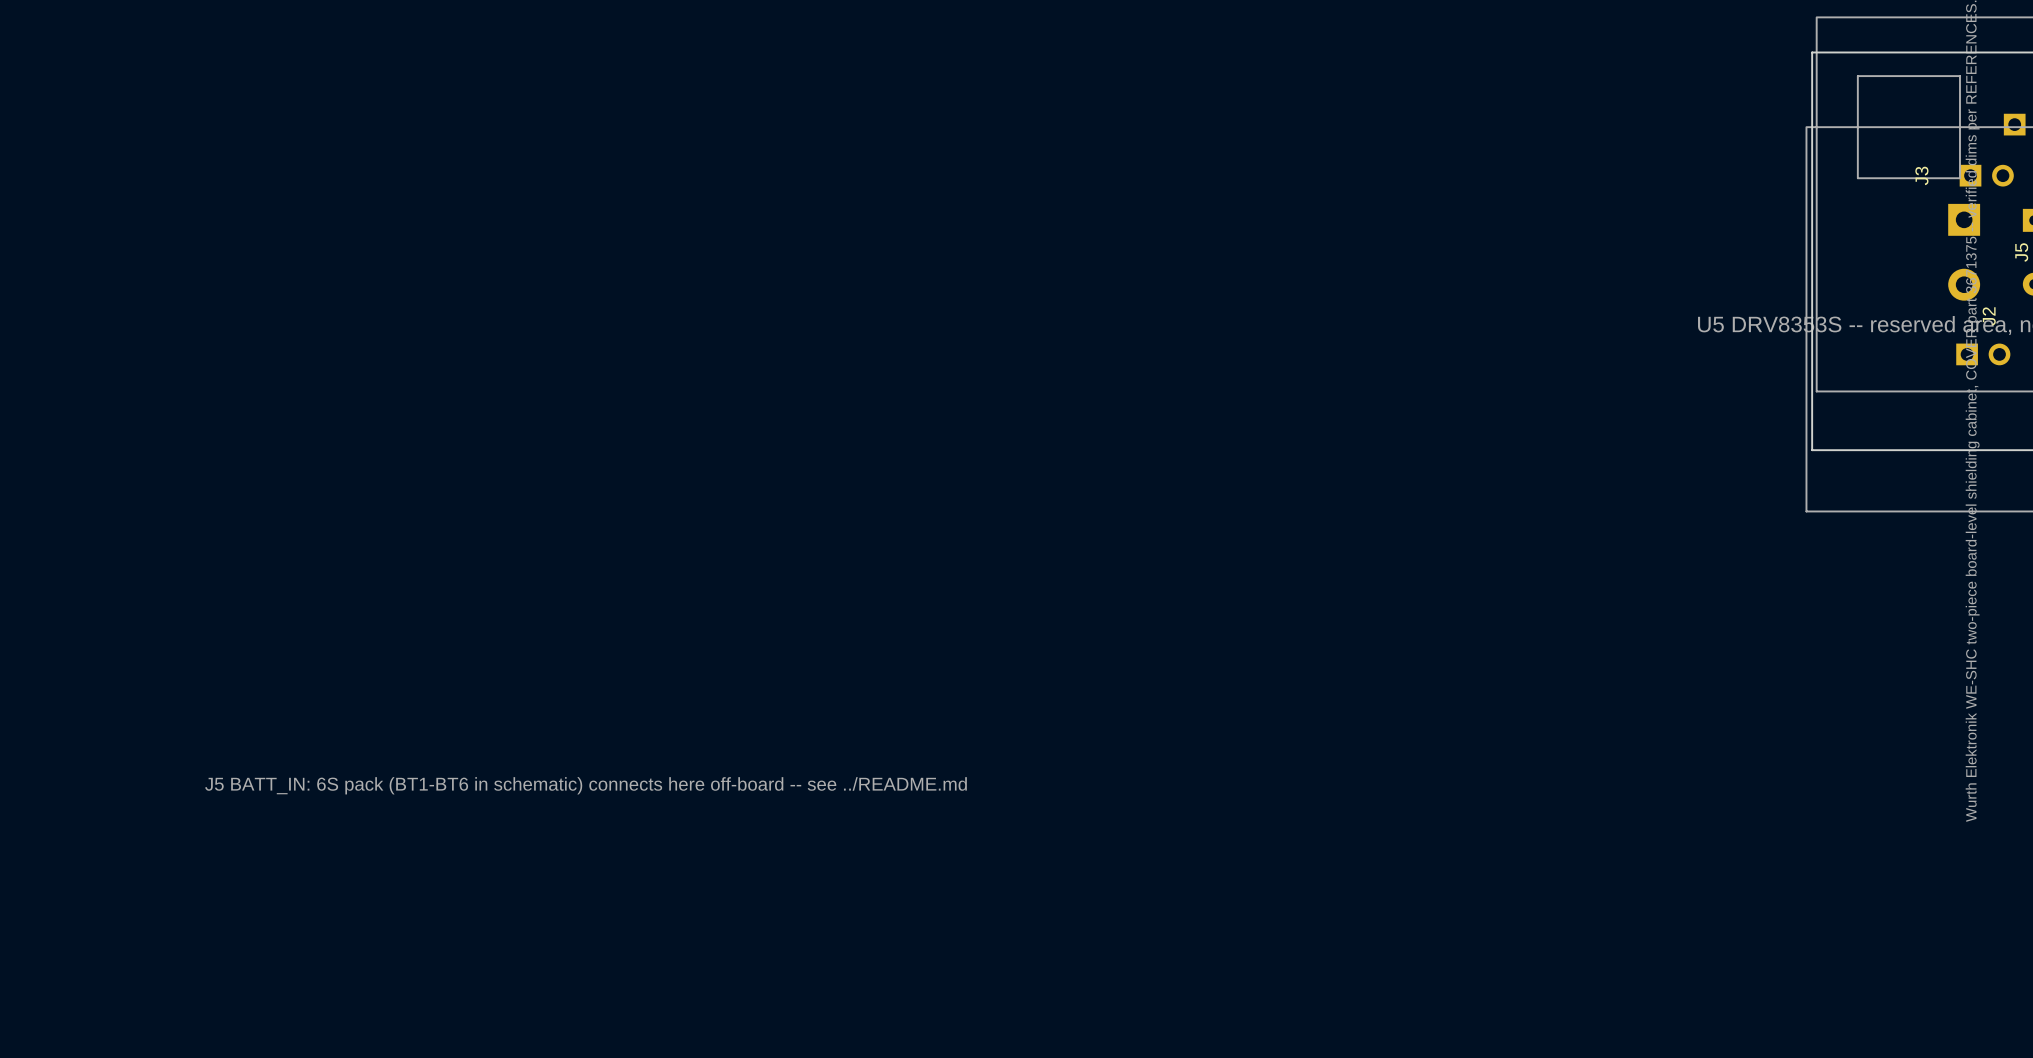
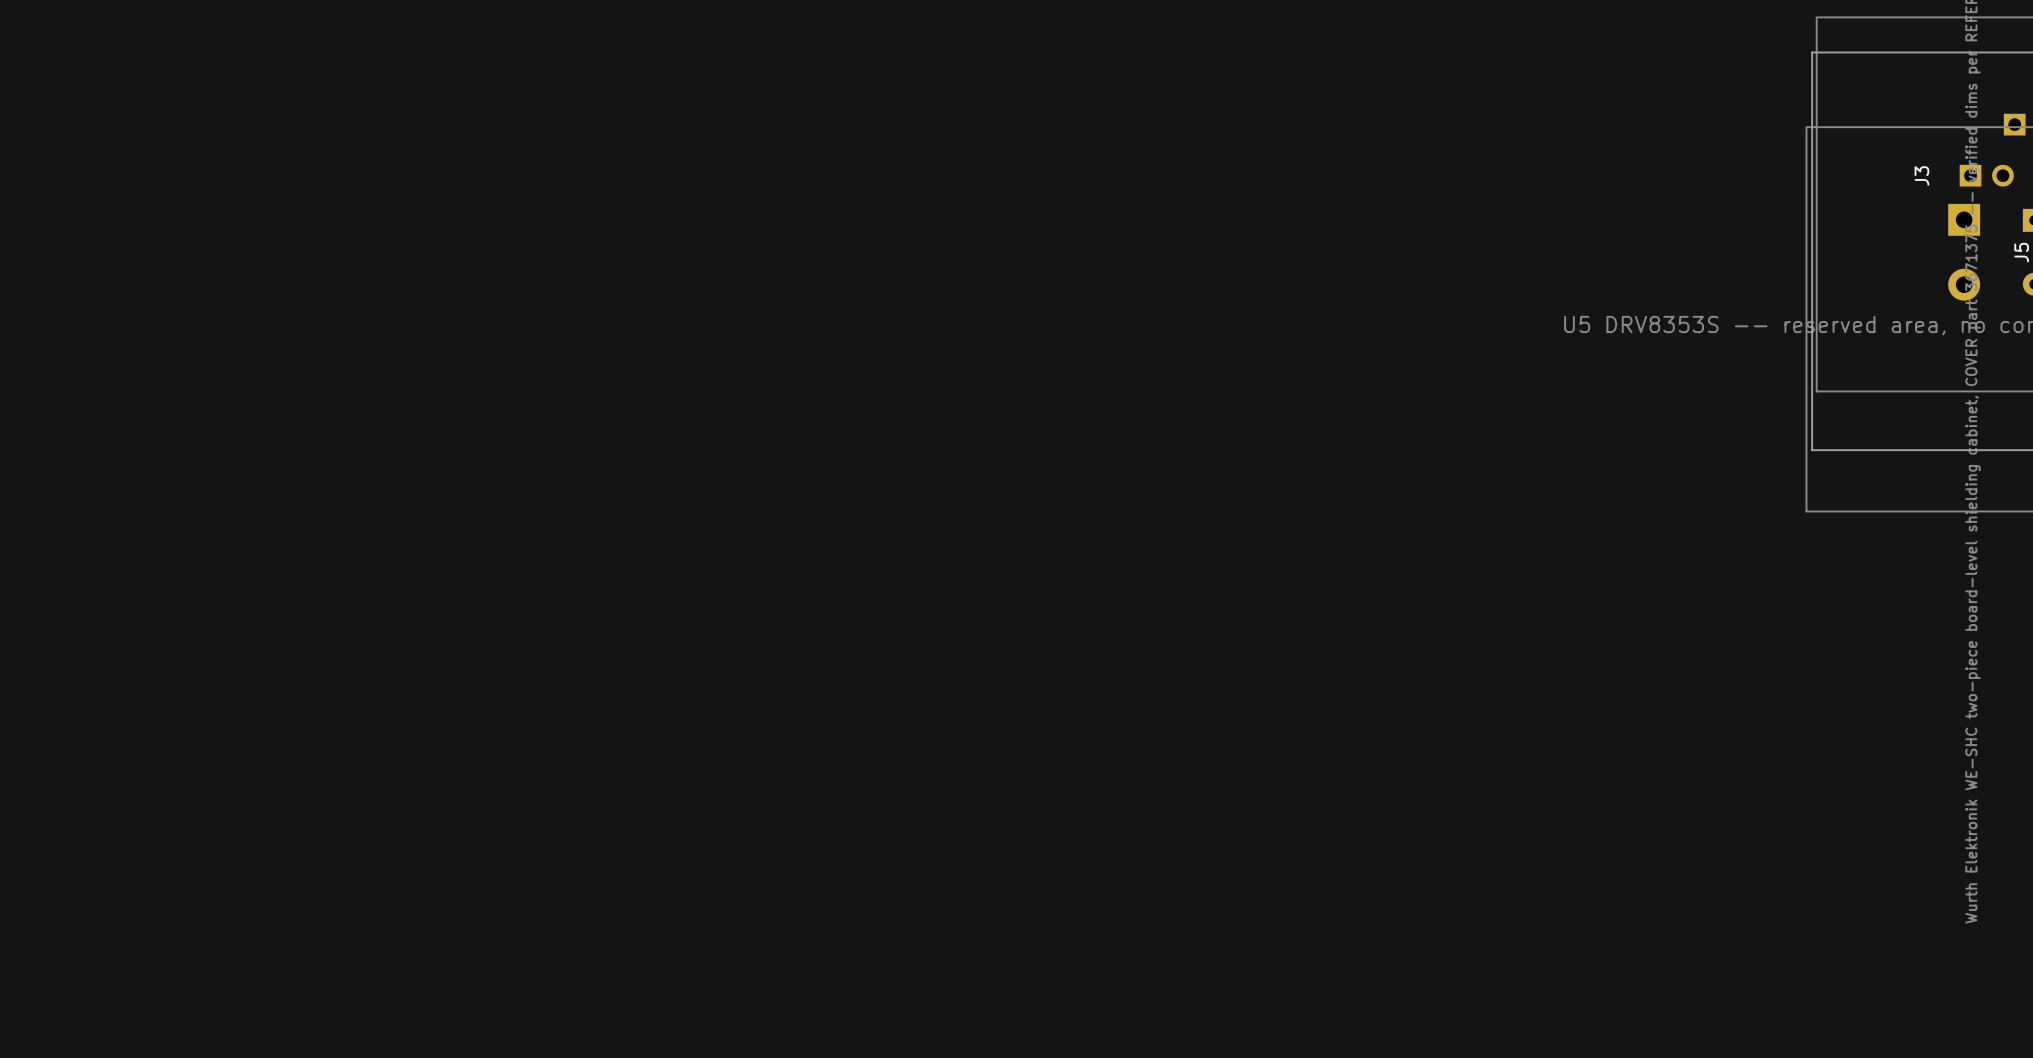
line: (1857, 76) (1959, 76) (1959, 178) (1857, 178) (1857, 76) -> none
J2: (1983, 354) -> none
text: J5 BATT_IN: 6S pack (BT1-BT6 in schematic) connects here off-board -- see ../README.md (586, 785) -> none

